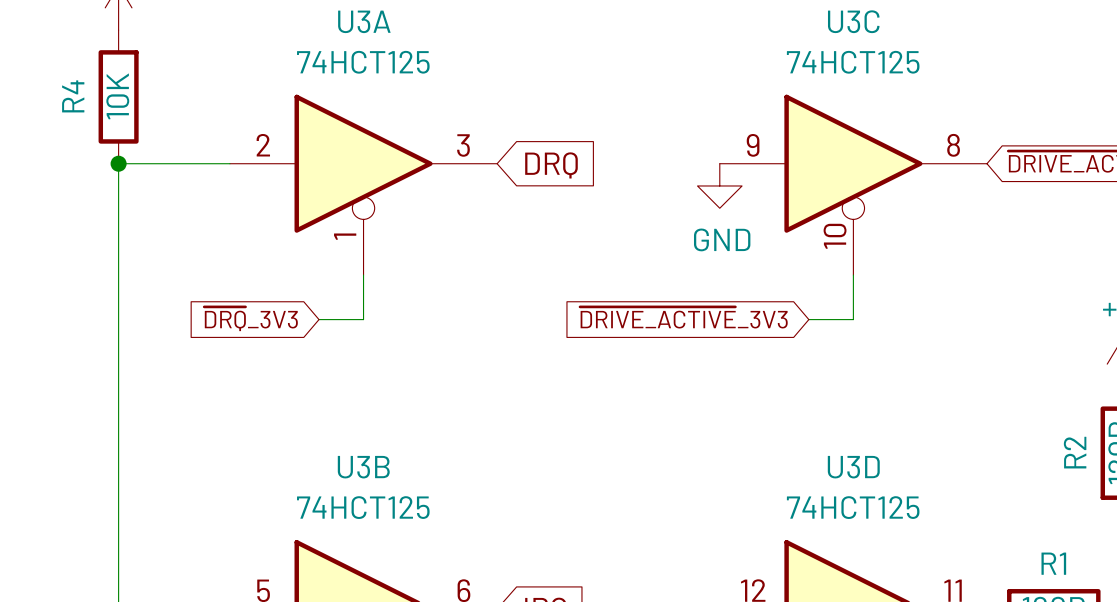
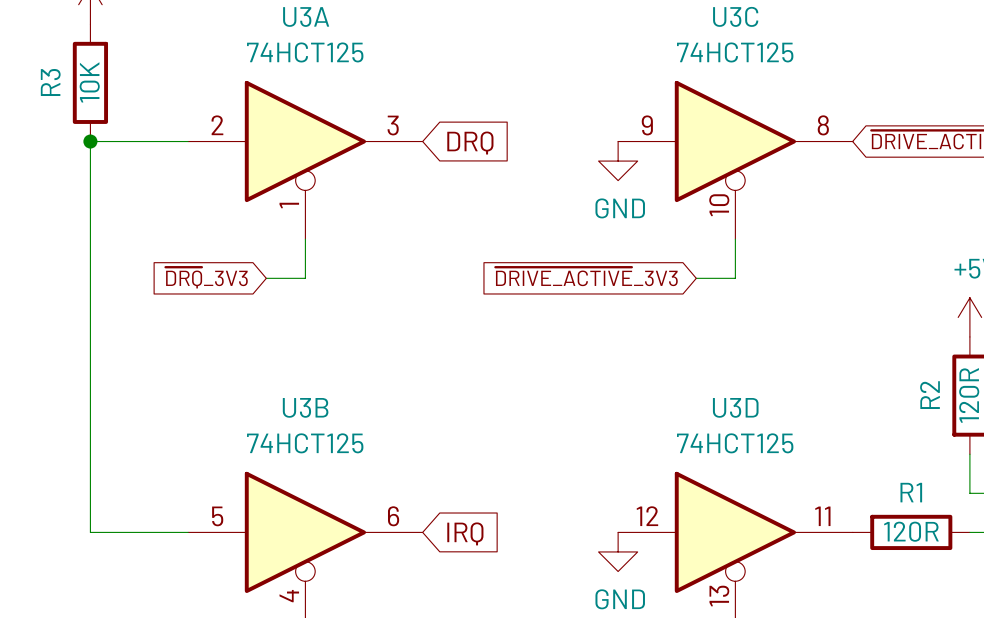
R4 name: R4 (73, 96) -> R3 (50, 82)

